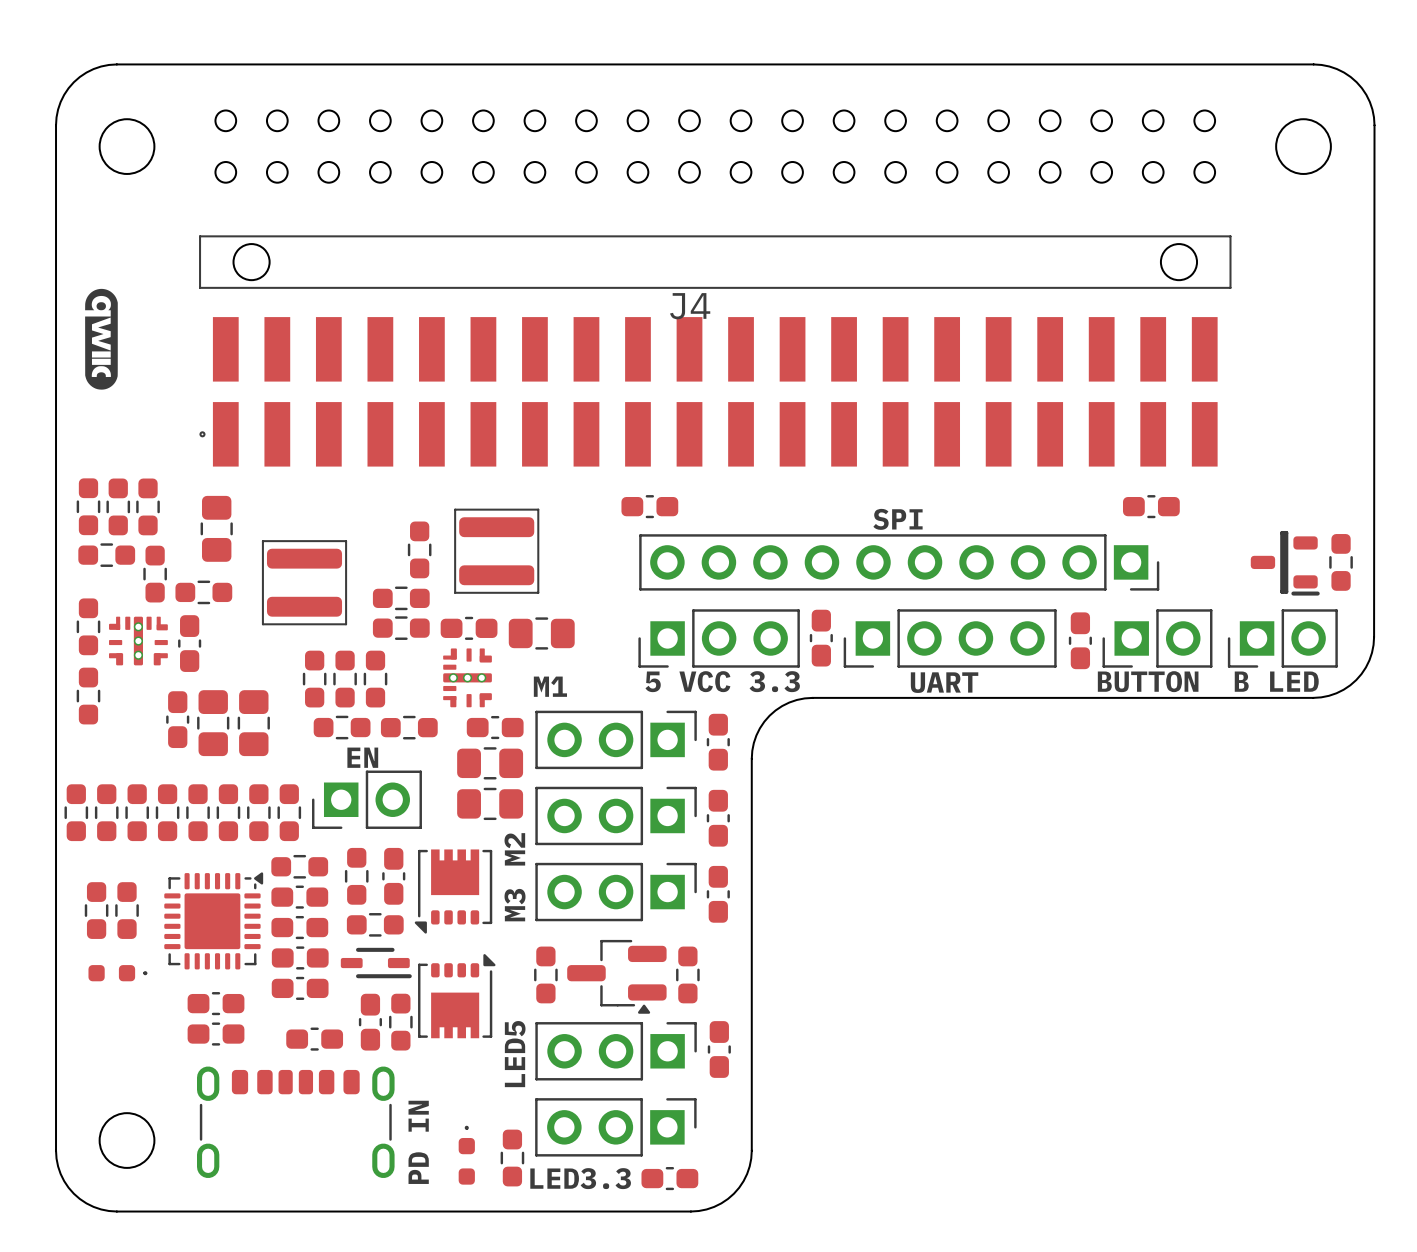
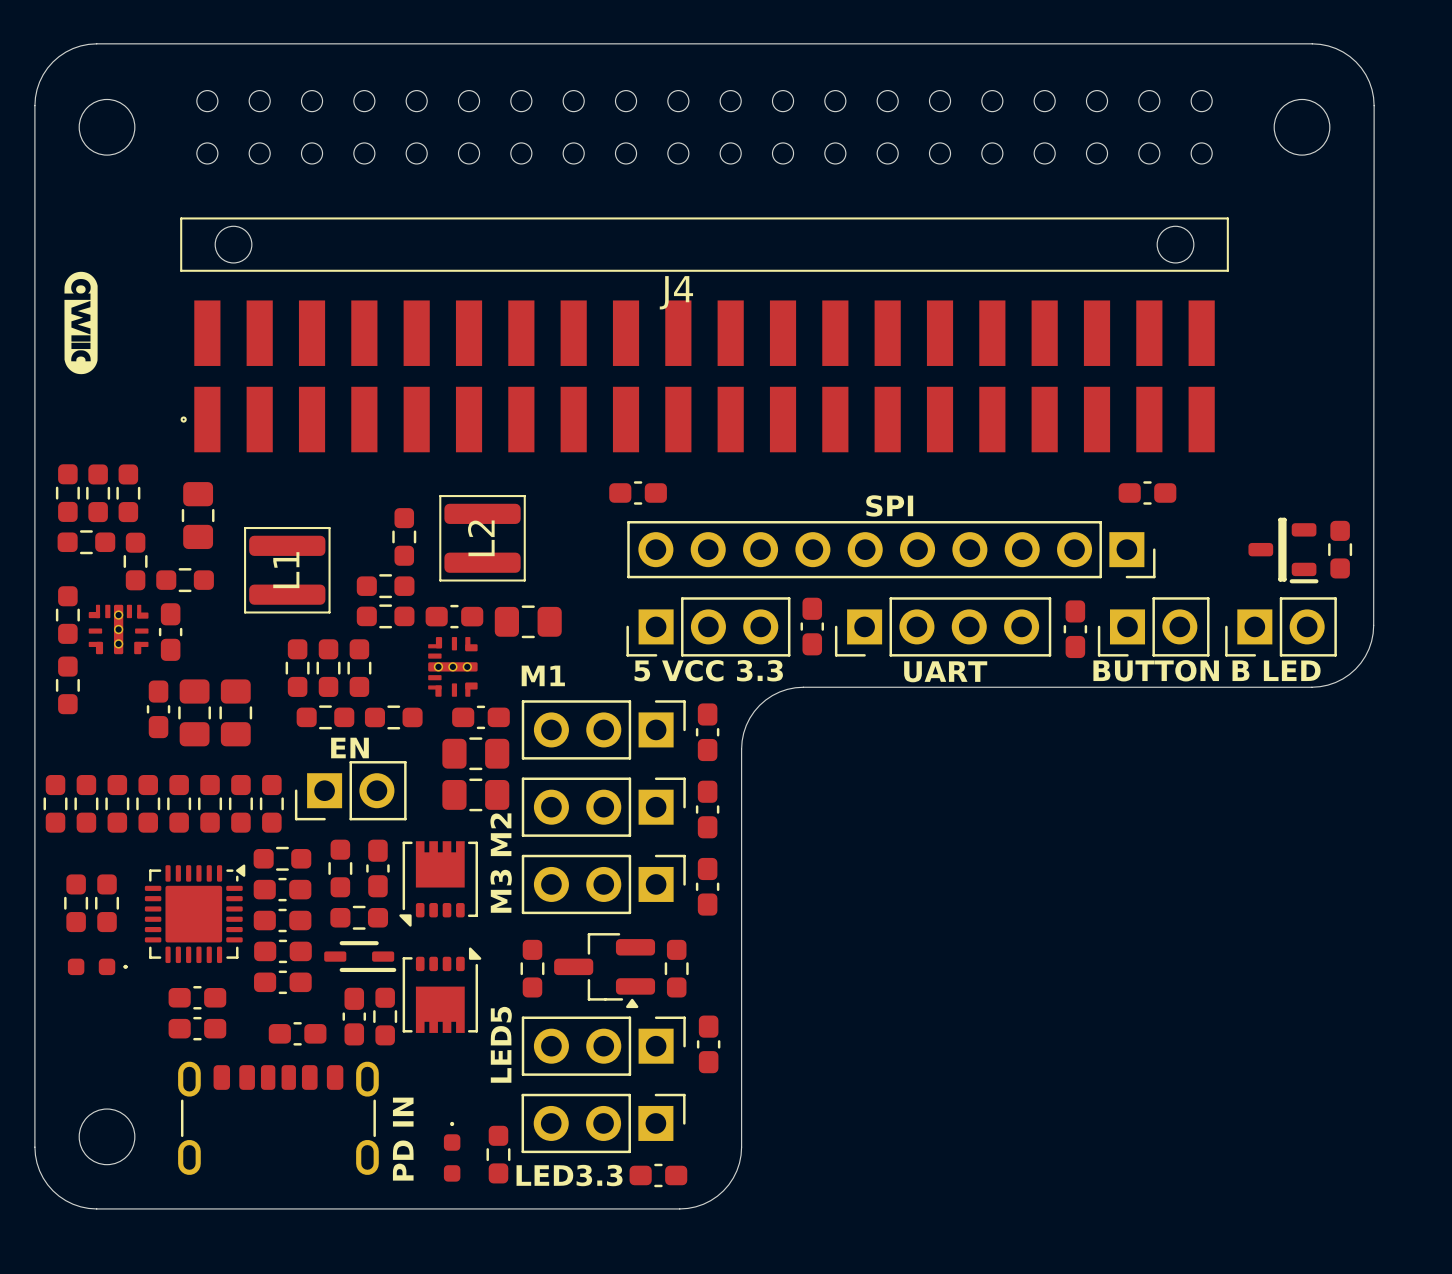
L2 name: none -> L2 (481, 538)
L1 name: none -> L1 (286, 570)

